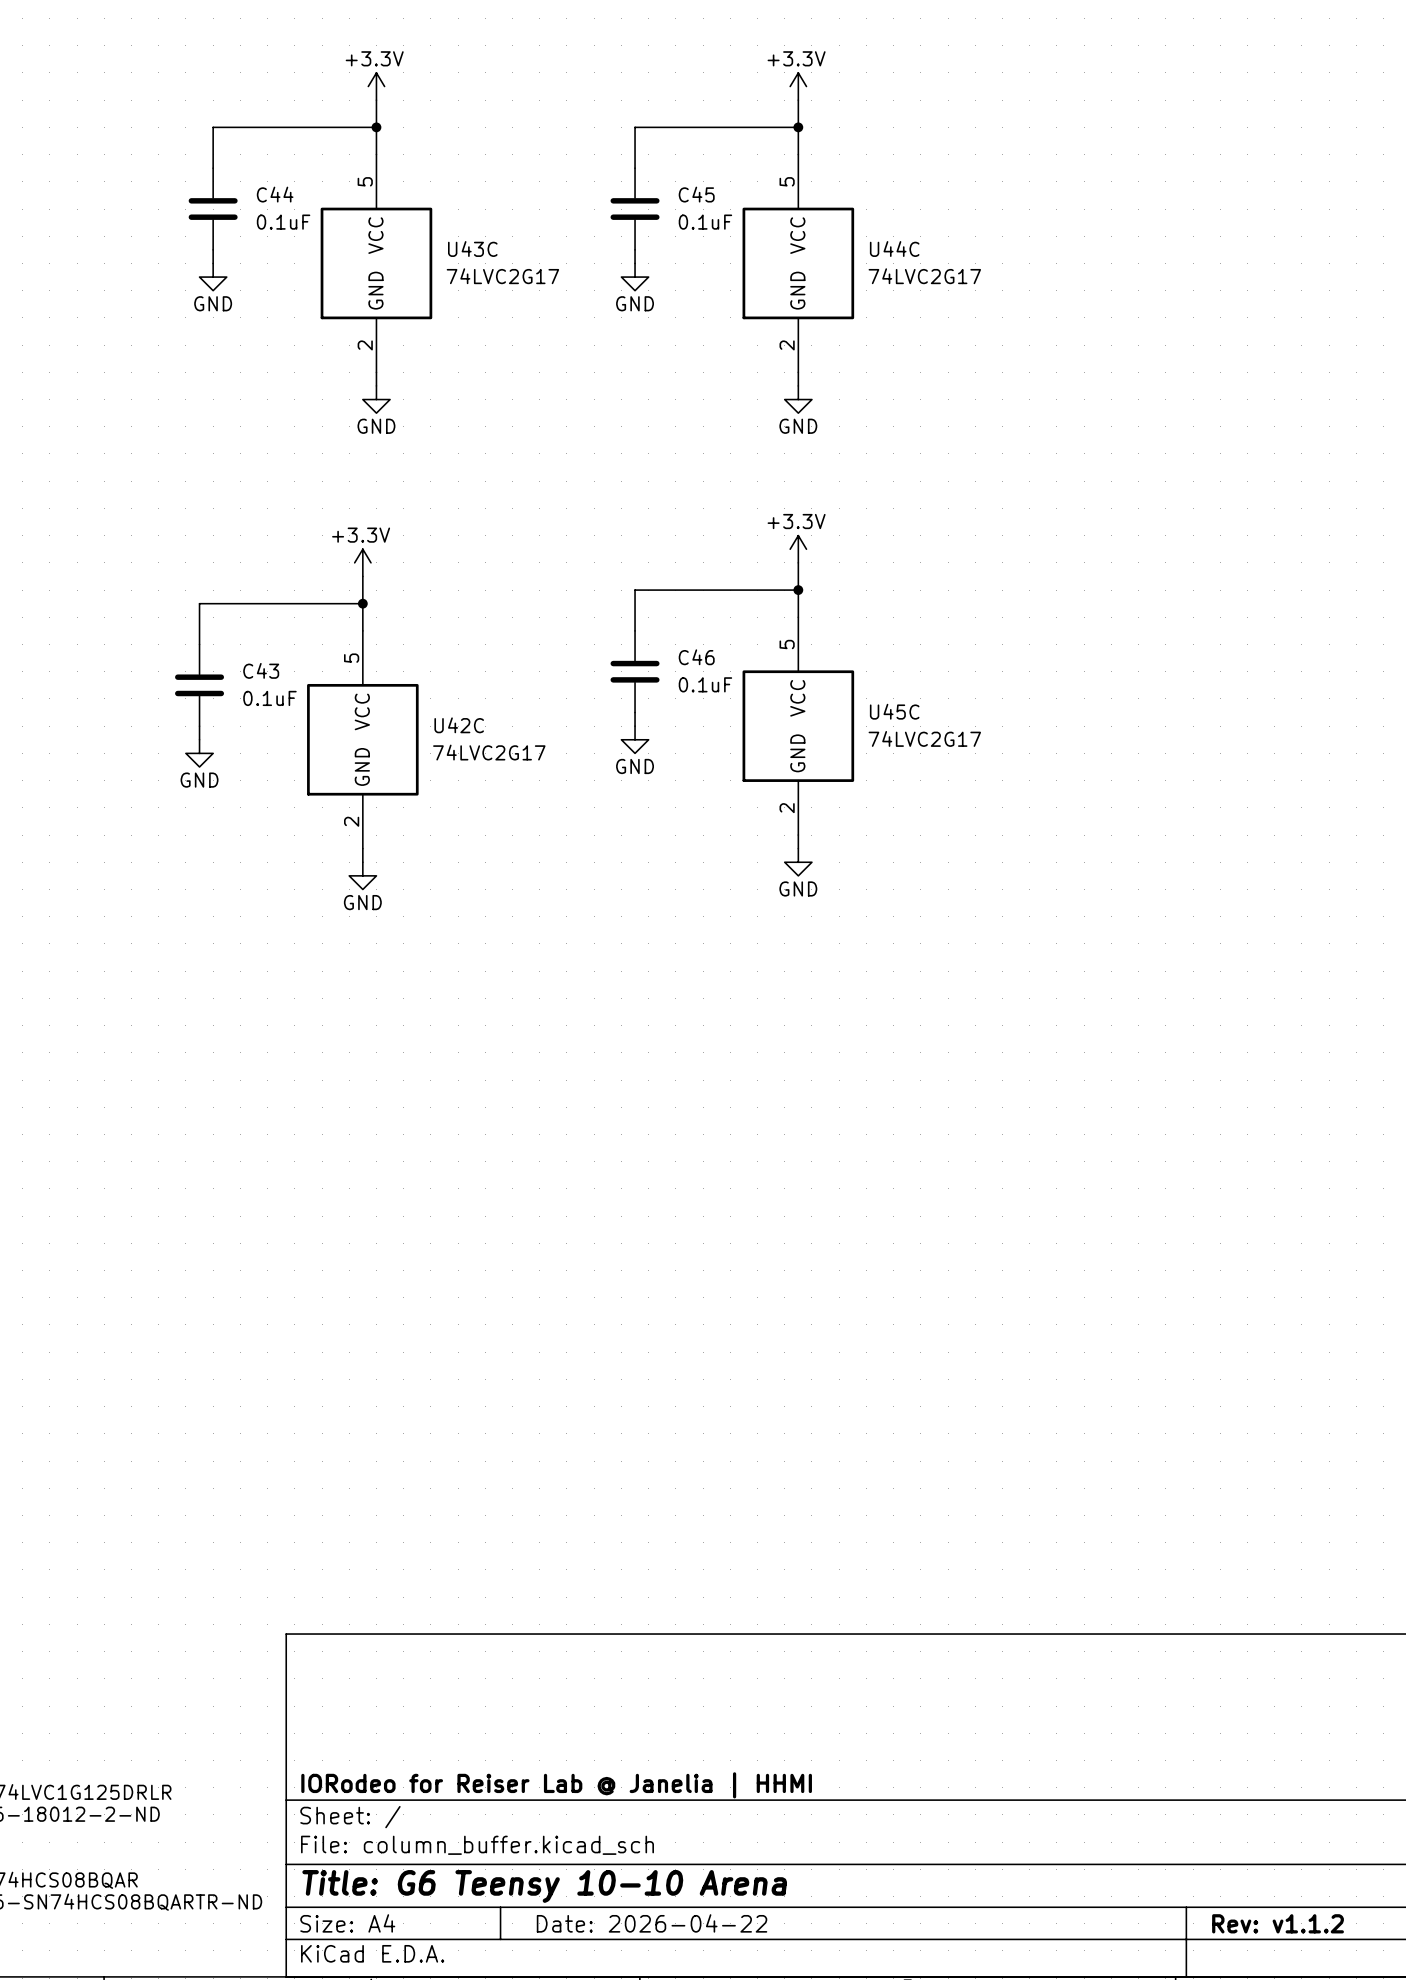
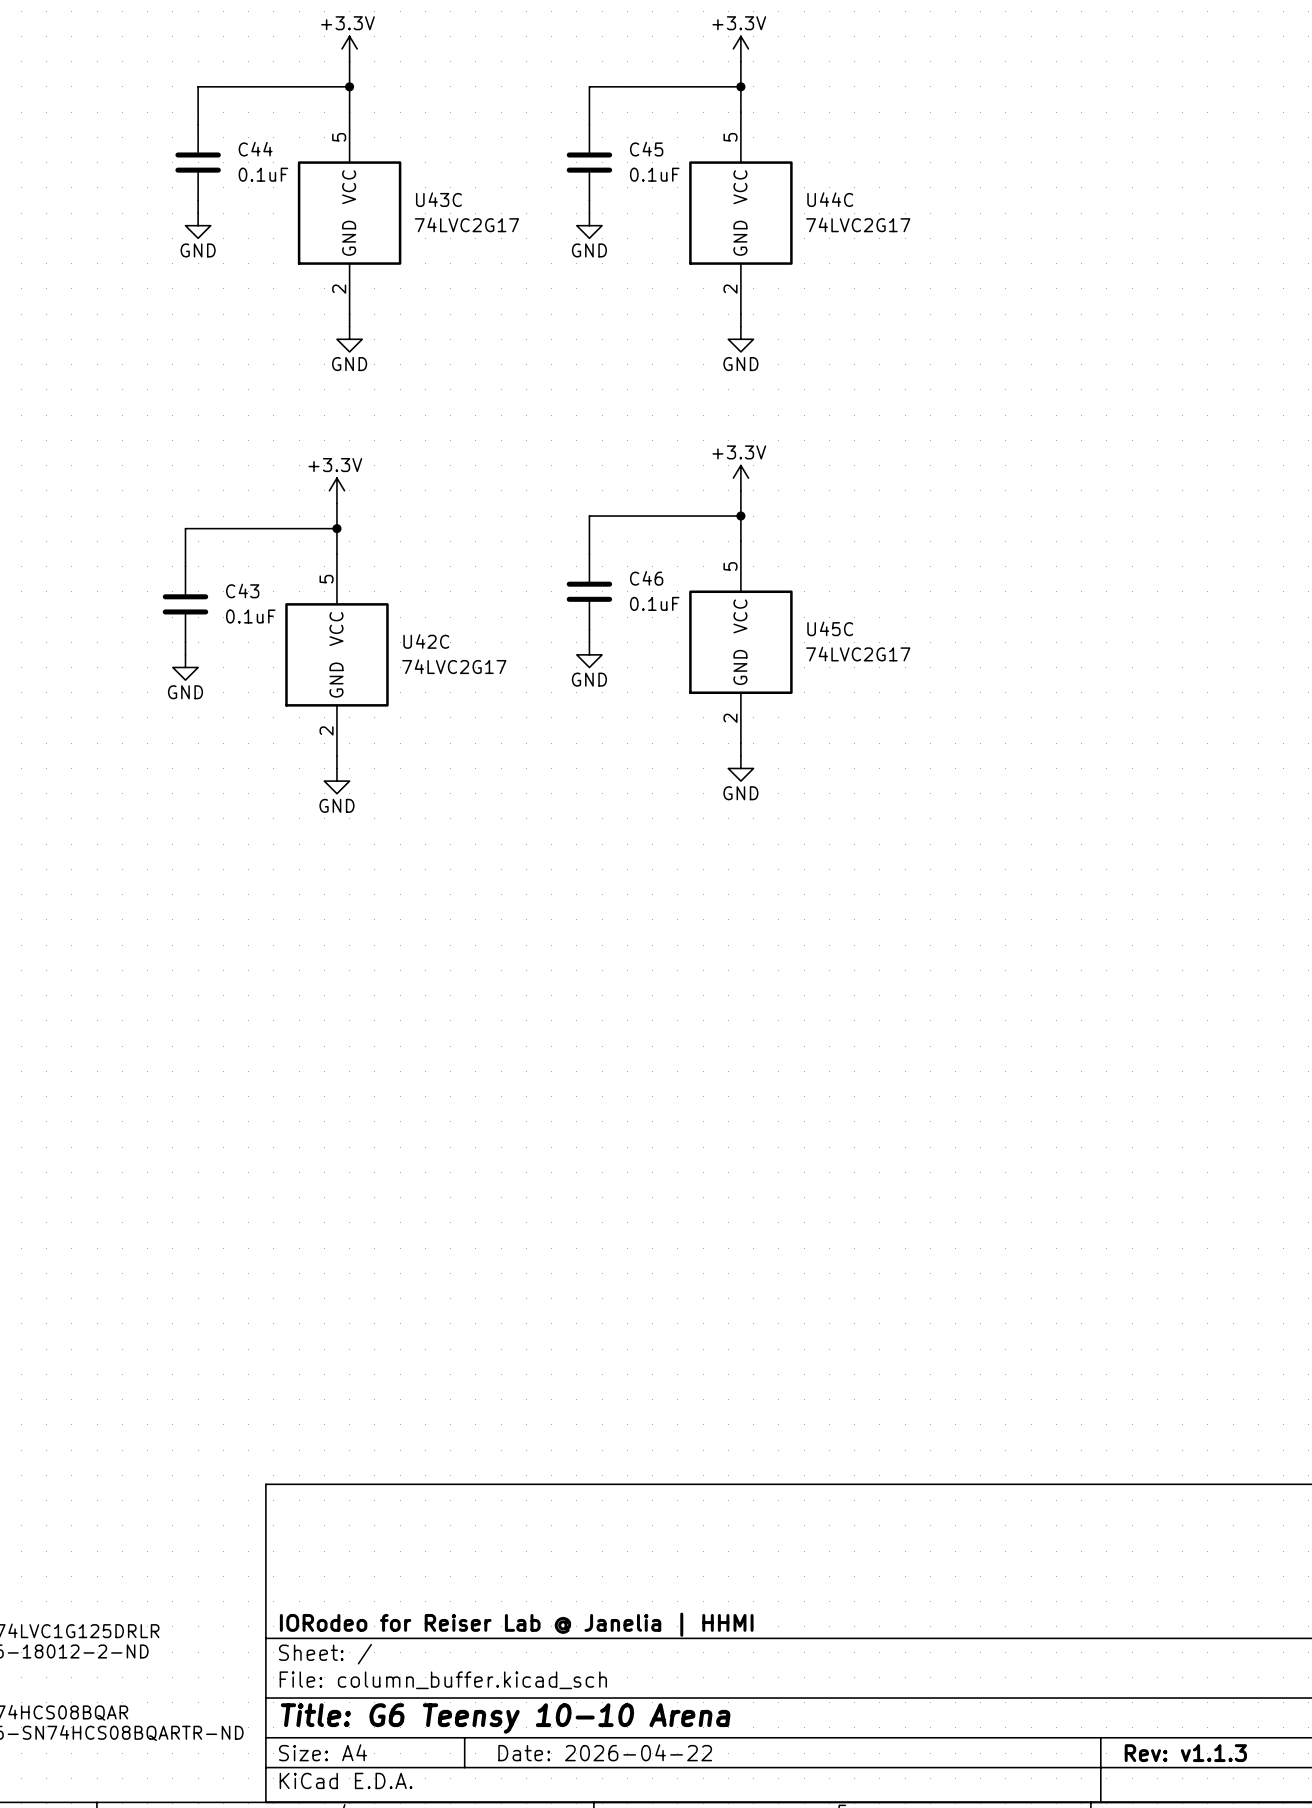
title block: Rev: v1.1.2 (1278, 1923) -> Rev: v1.1.3 (1185, 1753)

